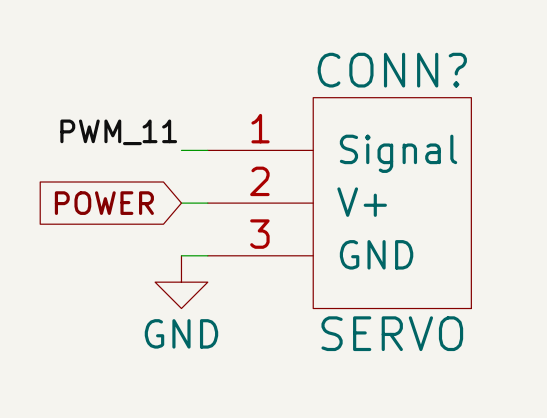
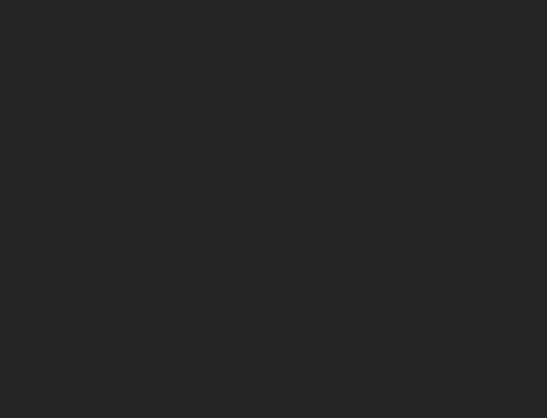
label: PWM_11 (118, 132) -> none
wire: (181, 150) (207, 150) -> none
global label: POWER (104, 203) -> none
wire: (181, 203) (207, 203) -> none
CONN?: SERVO (339, 203) -> none
wire: (181, 255) (207, 255) -> none
power symbol: GND (181, 282) -> none

